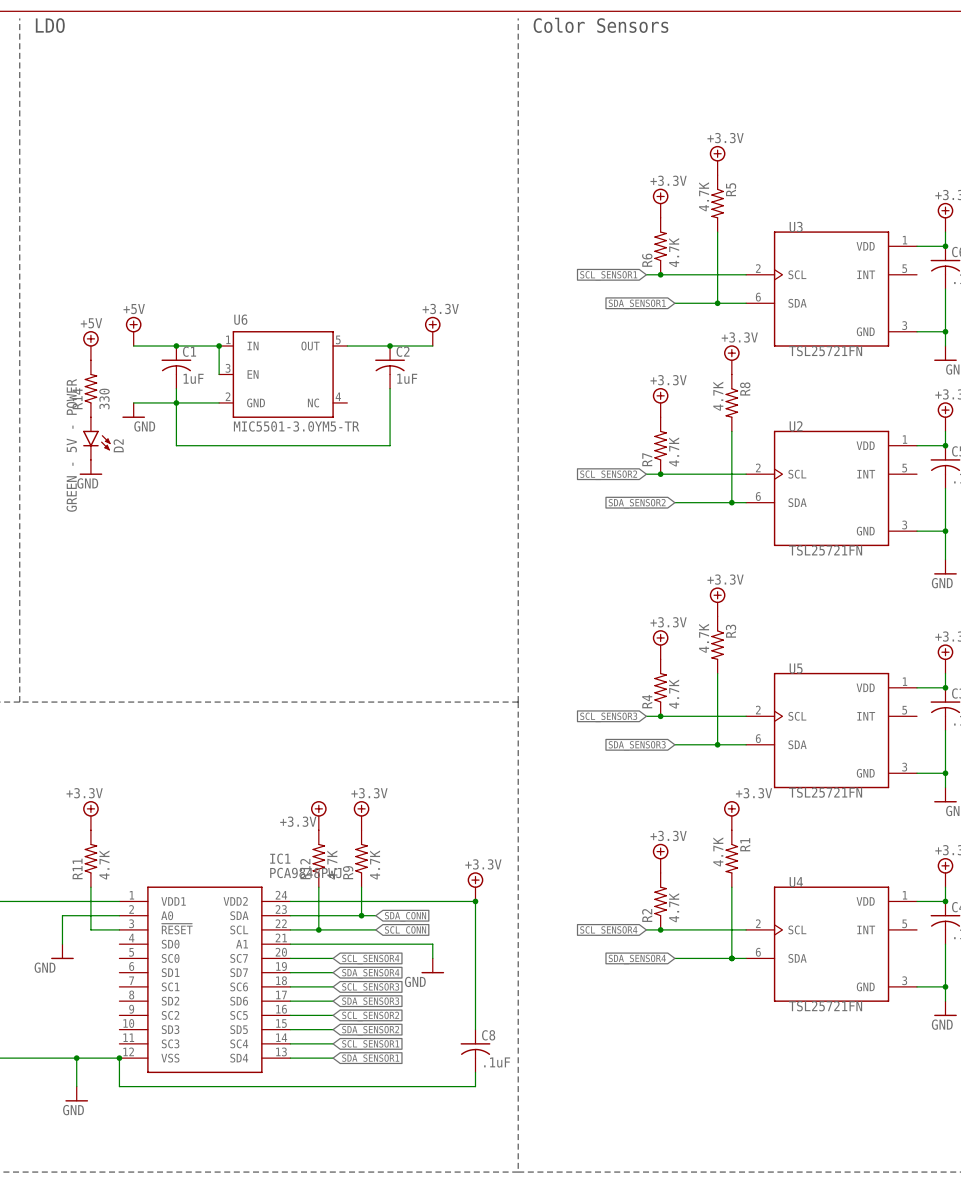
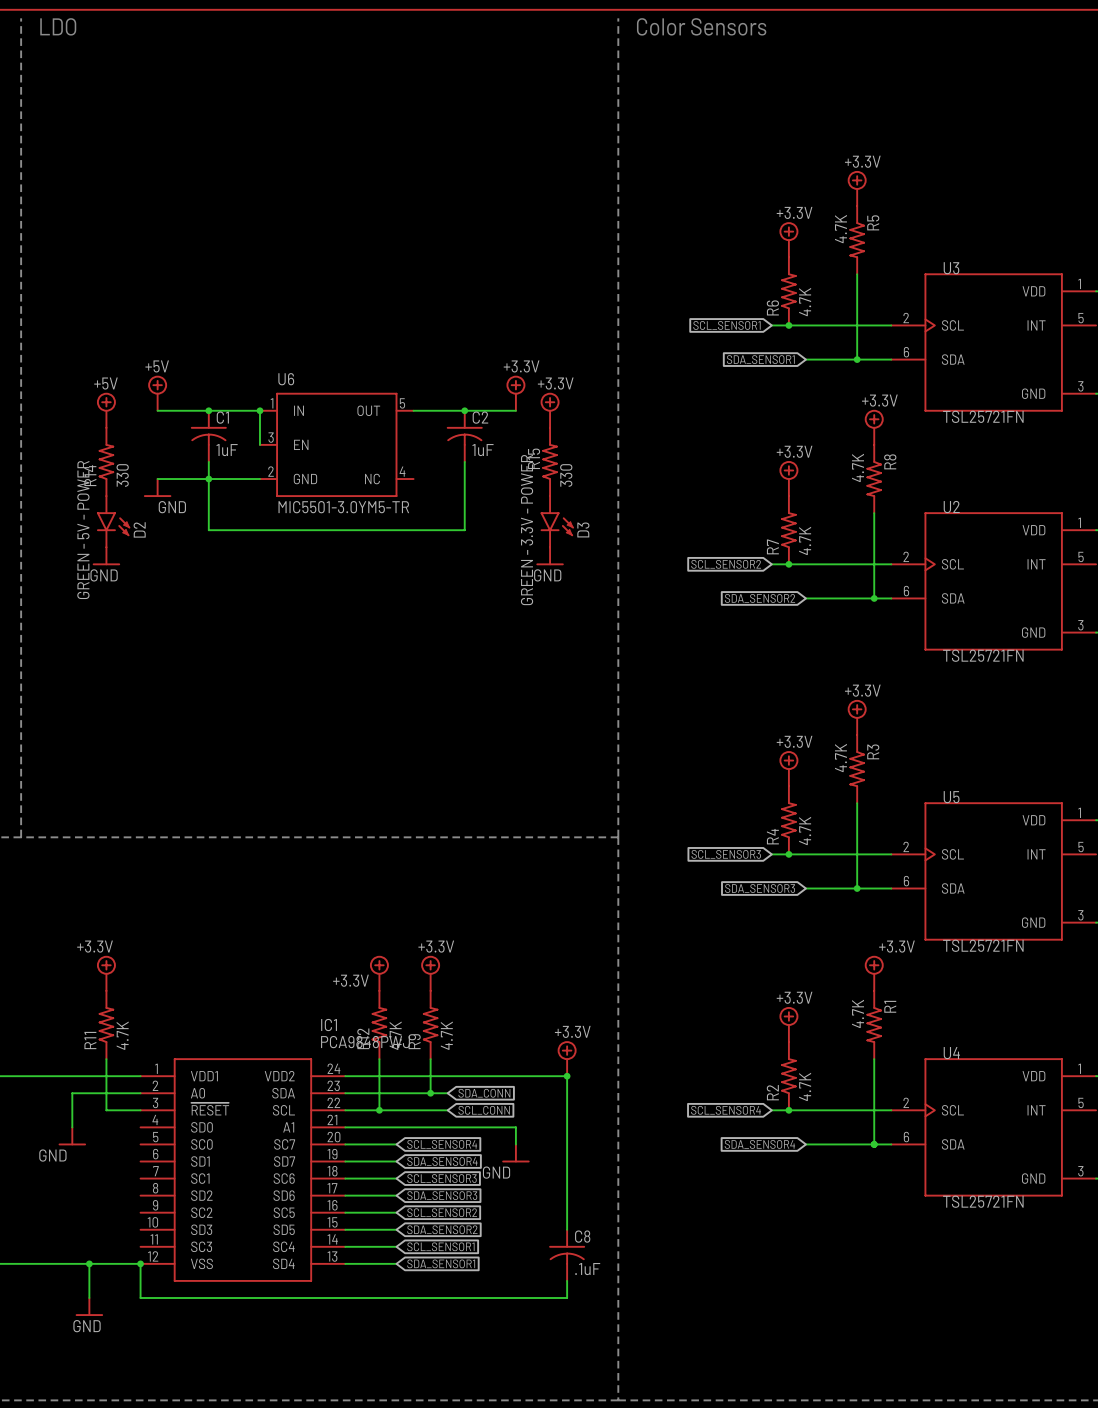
power symbol: none -> +3.3V (550, 410)
R15: none -> 330 (550, 461)
D3: none -> GREEN - 3.3V - POWER (557, 521)
power symbol: none -> GND (550, 556)

